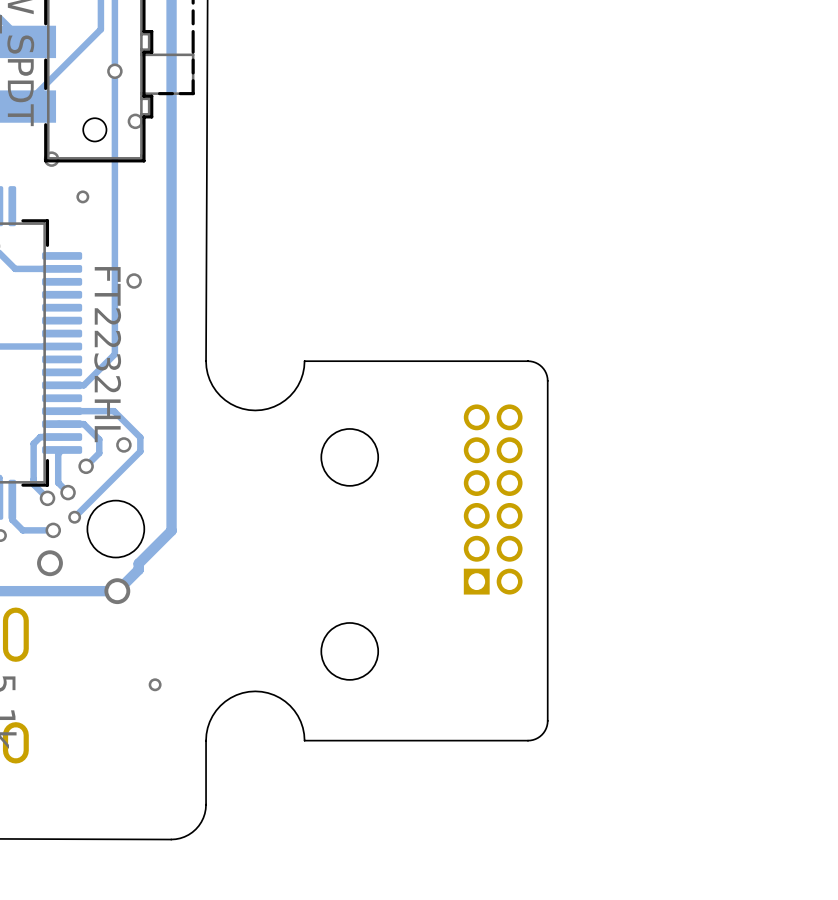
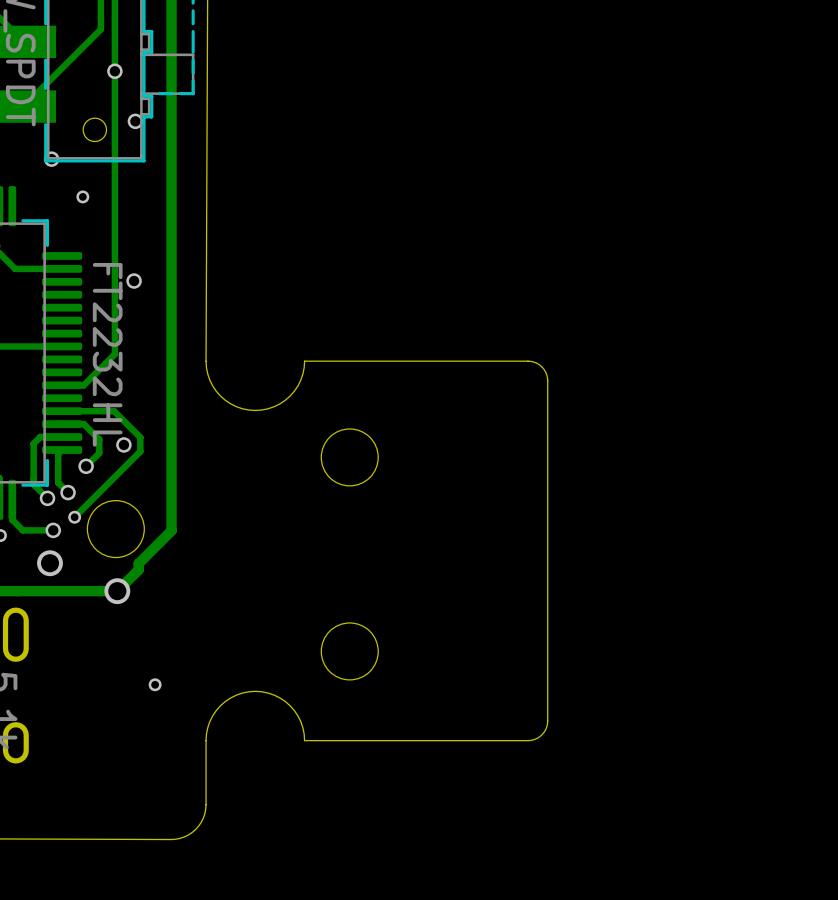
part: (493, 499) -> none

